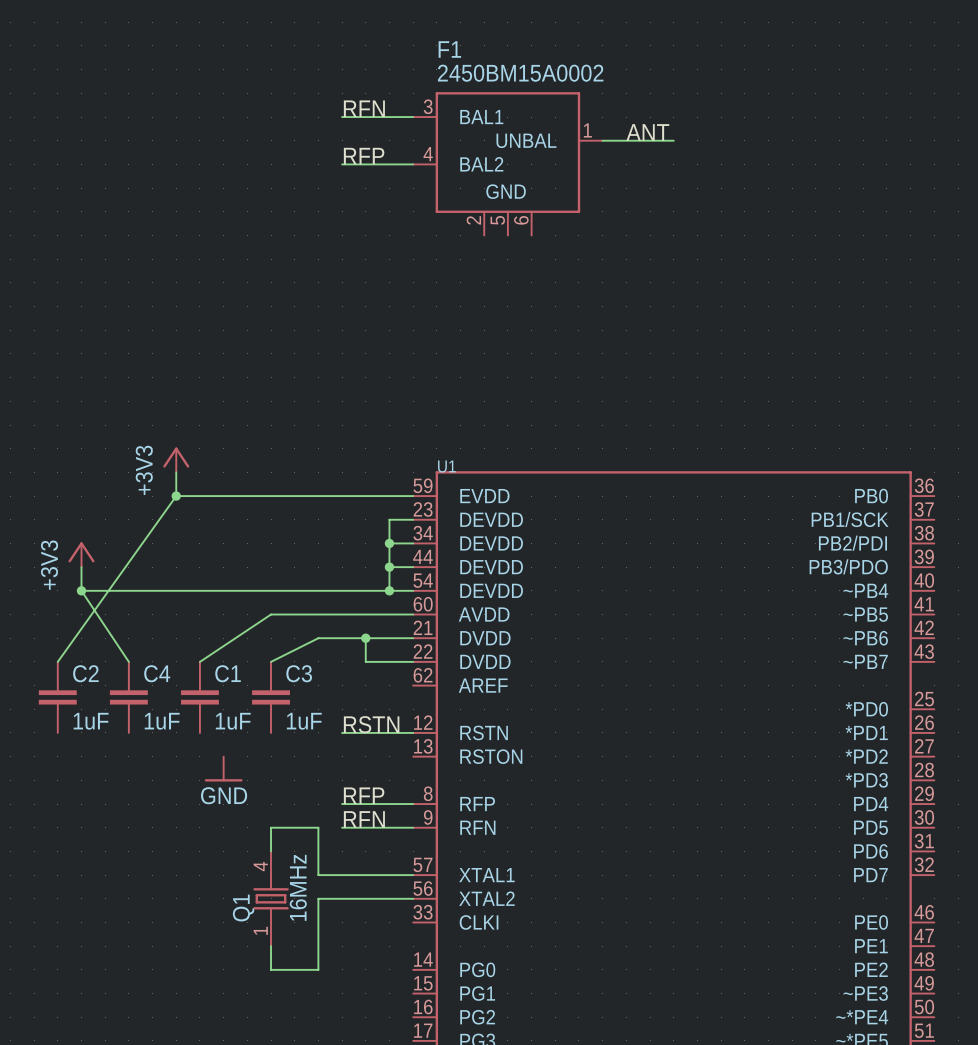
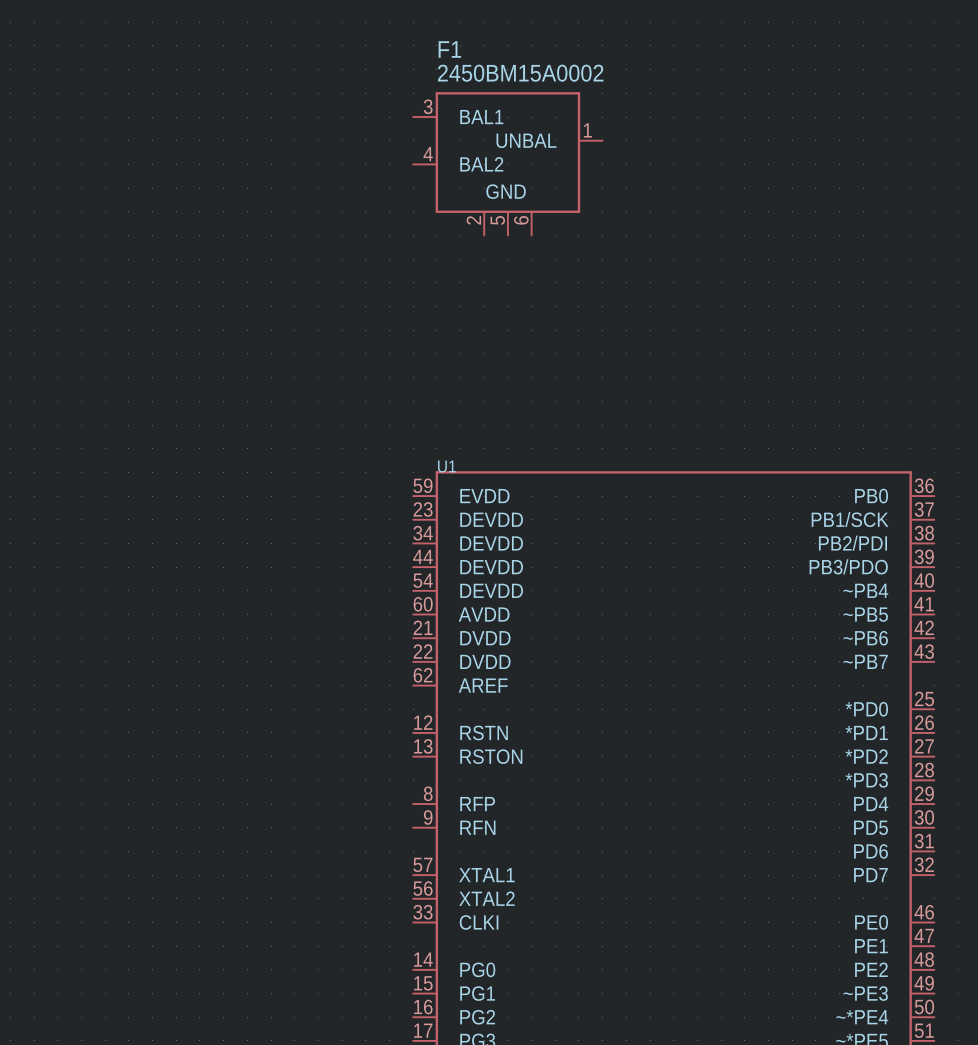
label: RFN (364, 108) -> none
wire: (342, 117) (413, 117) -> none
label: ANT (647, 132) -> none
wire: (602, 140) (673, 140) -> none
label: RFP (364, 156) -> none
wire: (342, 164) (413, 164) -> none
power symbol: +3V3 (176, 459) -> none
wire: (176, 472) (176, 496) -> none
wire: (176, 496) (413, 496) -> none
wire: (176, 496) (57, 661) -> none
junction: (176, 496) -> none
wire: (413, 519) (389, 519) (389, 590) -> none
wire: (389, 543) (413, 543) -> none
junction: (389, 543) -> none
power symbol: +3V3 (81, 554) -> none
wire: (81, 567) (81, 590) -> none
wire: (389, 567) (413, 567) -> none
junction: (389, 567) -> none
wire: (81, 590) (413, 590) -> none
wire: (81, 590) (128, 661) -> none
junction: (81, 590) -> none
junction: (389, 590) -> none
wire: (413, 614) (271, 614) (199, 661) -> none
wire: (365, 638) (365, 661) (413, 661) -> none
junction: (365, 638) -> none
wire: (413, 638) (318, 638) (271, 661) -> none
C2: 1uF (57, 697) -> none
C4: 1uF (128, 697) -> none
C1: 1uF (199, 697) -> none
C3: 1uF (271, 697) -> none
label: RSTN (371, 724) -> none
wire: (342, 732) (413, 732) -> none
power symbol: GND (223, 769) -> none
label: RFP (364, 795) -> none
wire: (342, 804) (413, 804) -> none
label: RFN (364, 819) -> none
wire: (342, 827) (413, 827) -> none
wire: (271, 851) (271, 827) (318, 827) (318, 875) (413, 875) -> none
Q1: 16MHz (271, 898) -> none
wire: (413, 898) (318, 898) (318, 969) (271, 969) (271, 946) -> none

